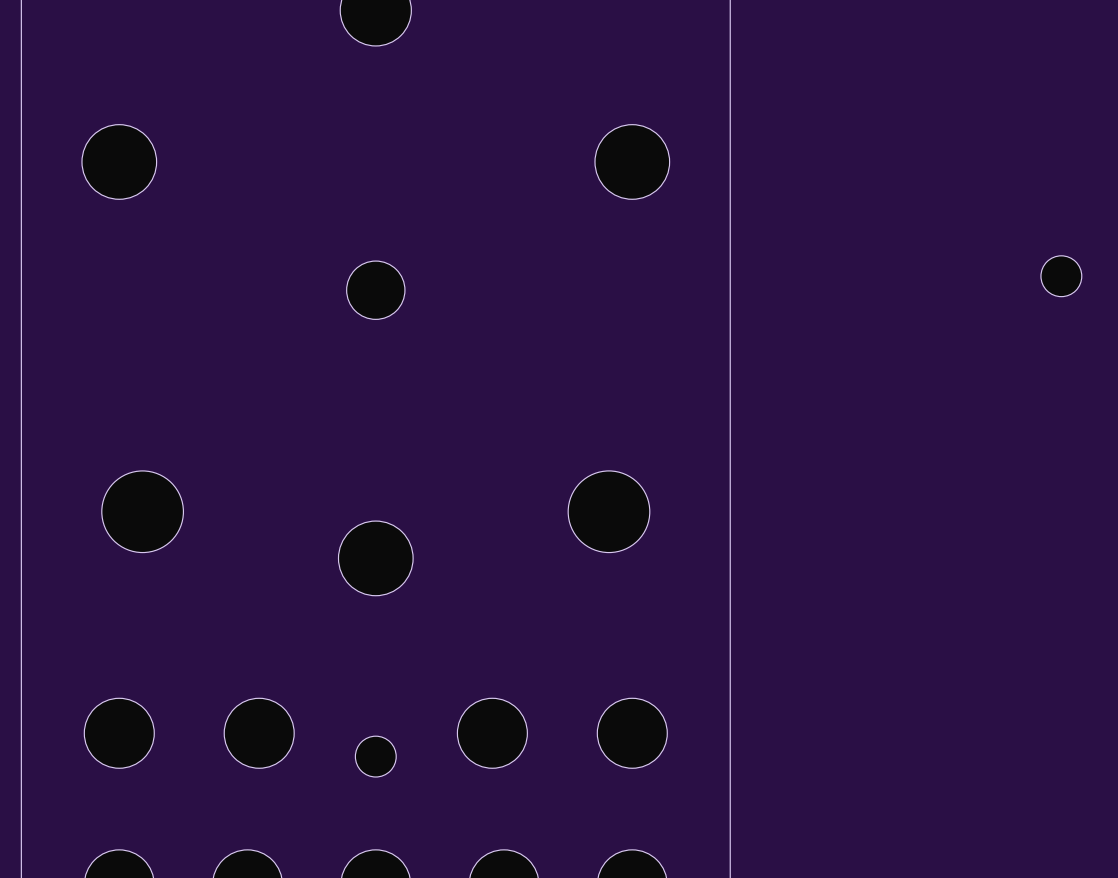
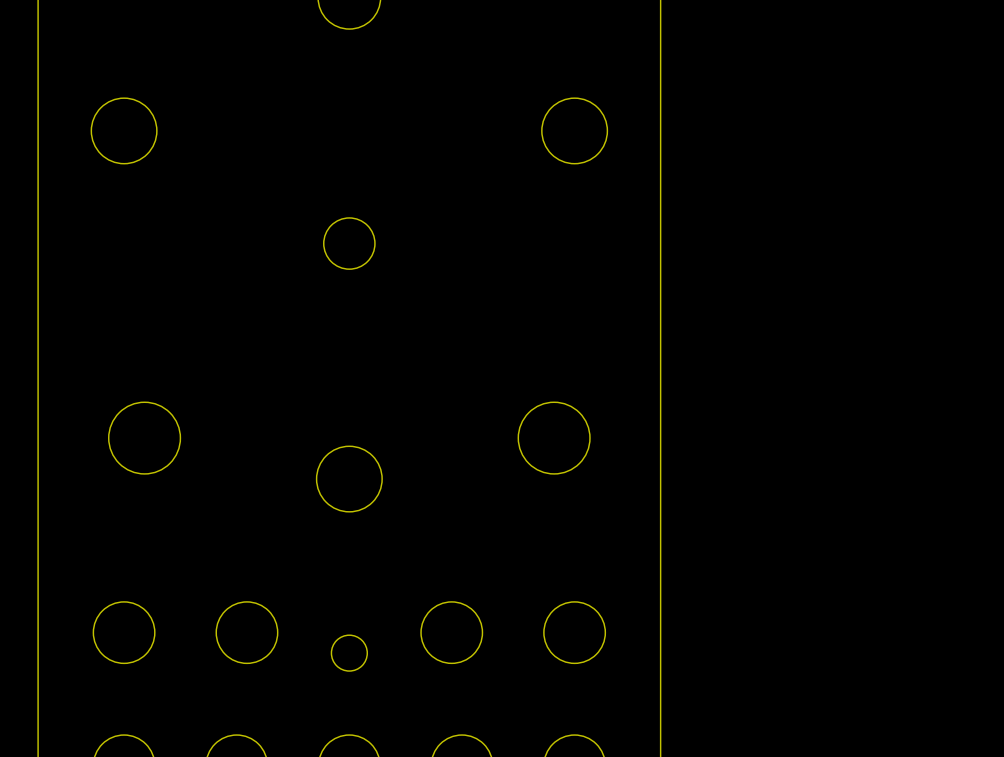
part: (1061, 276) -> none

